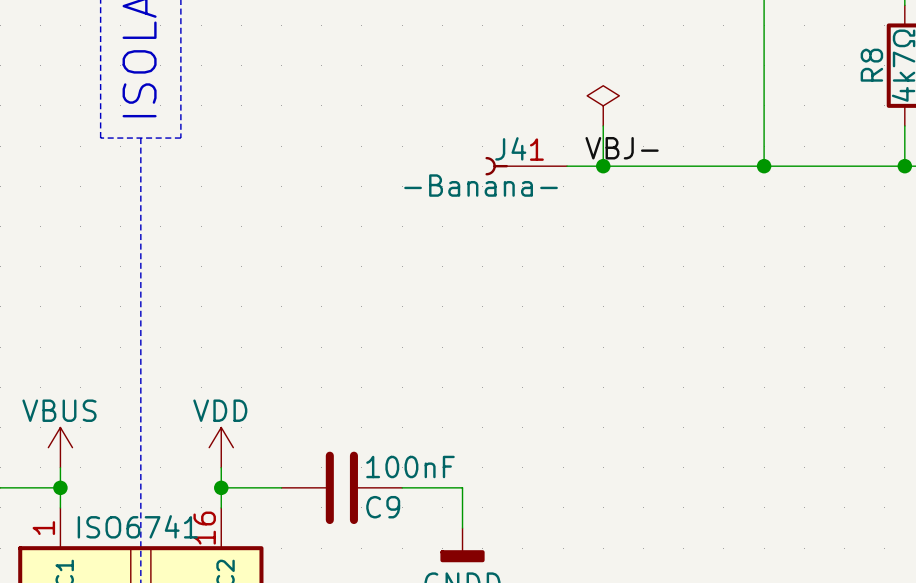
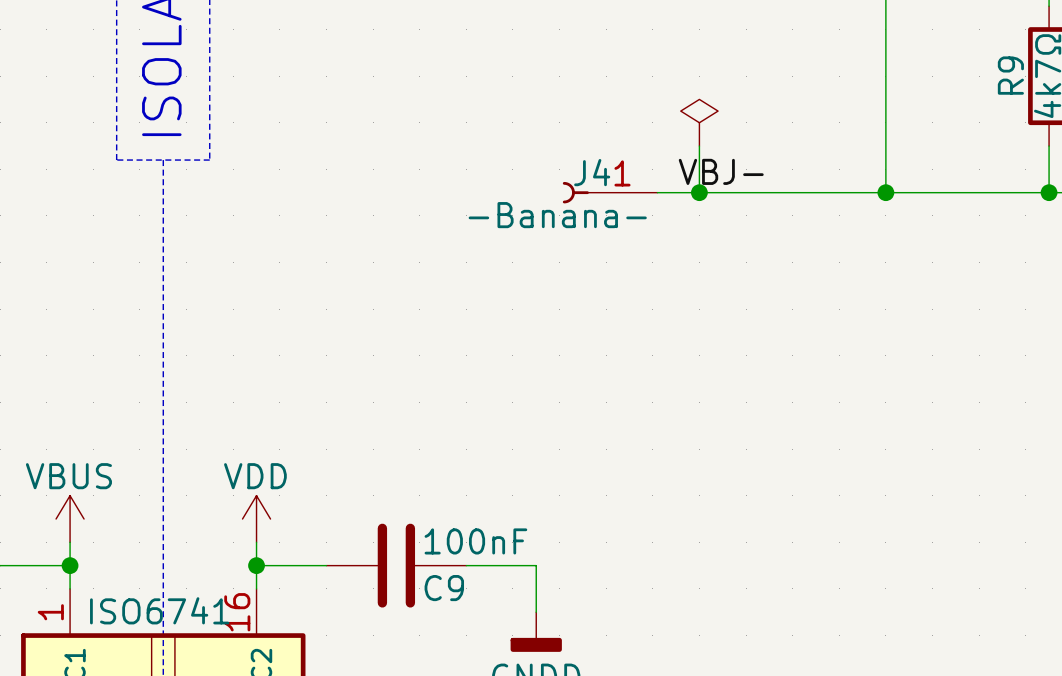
R8 name: R8 (871, 65) -> R9 (1010, 75)

